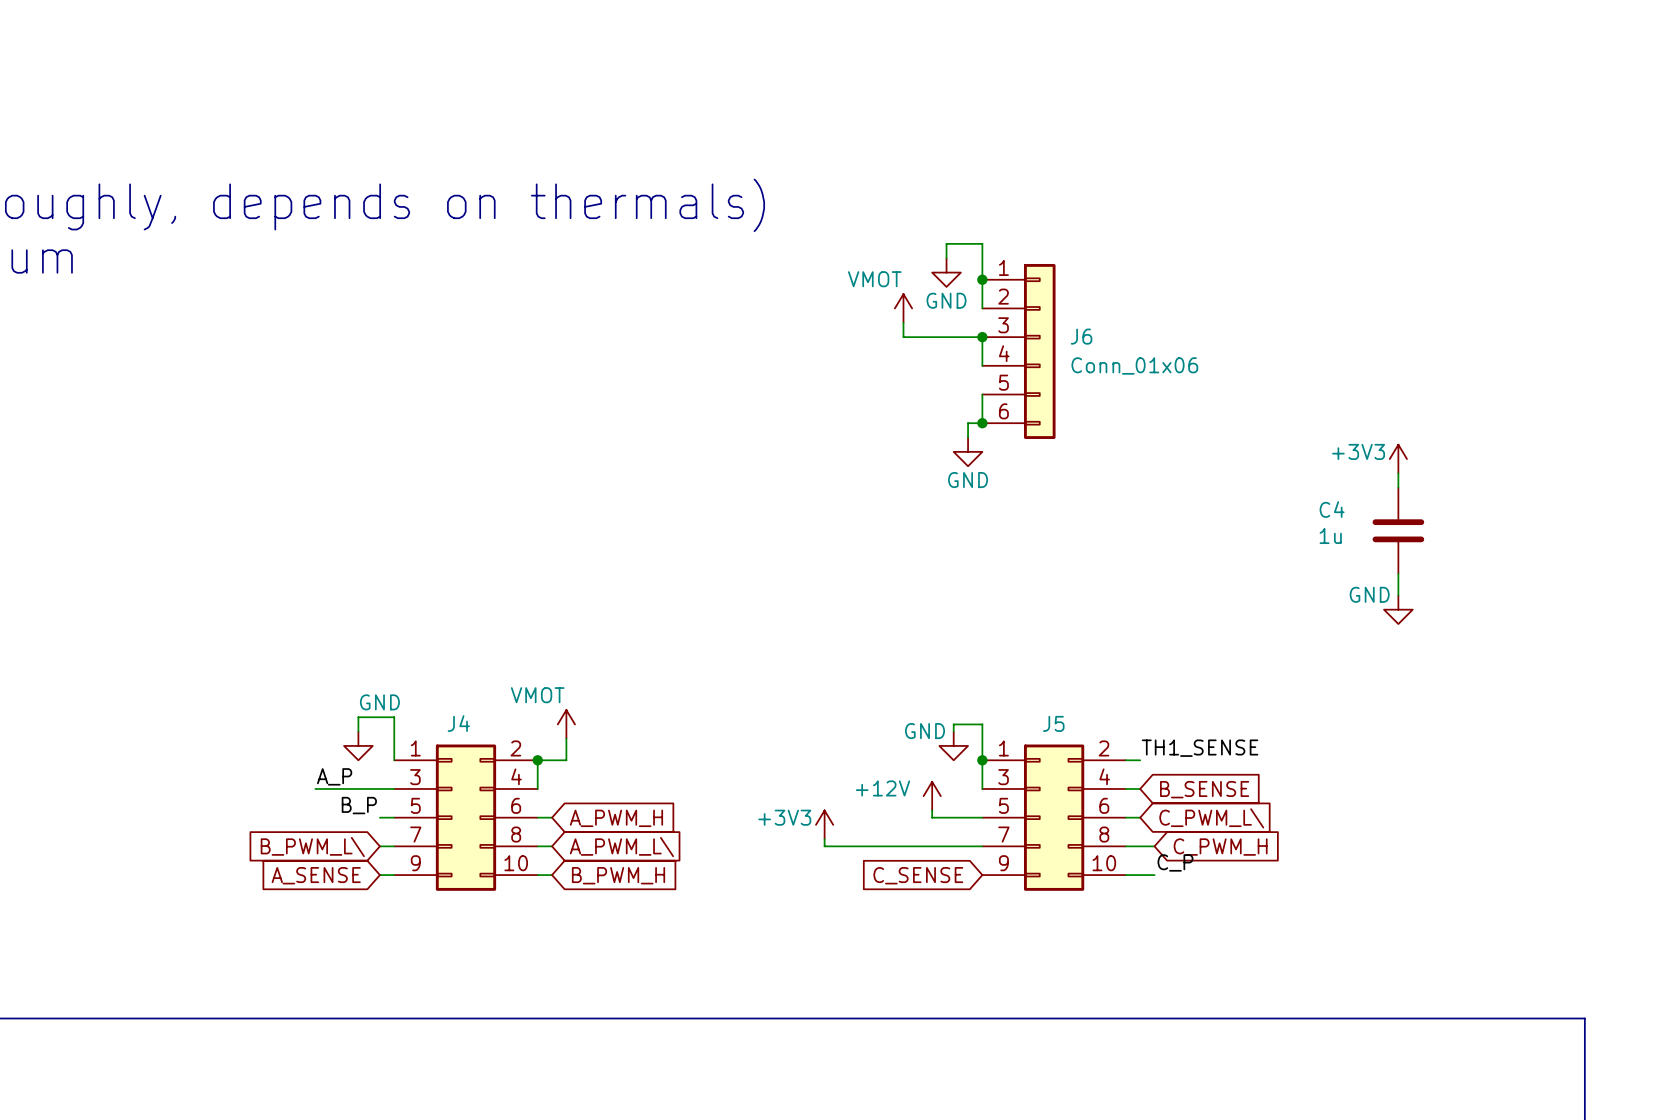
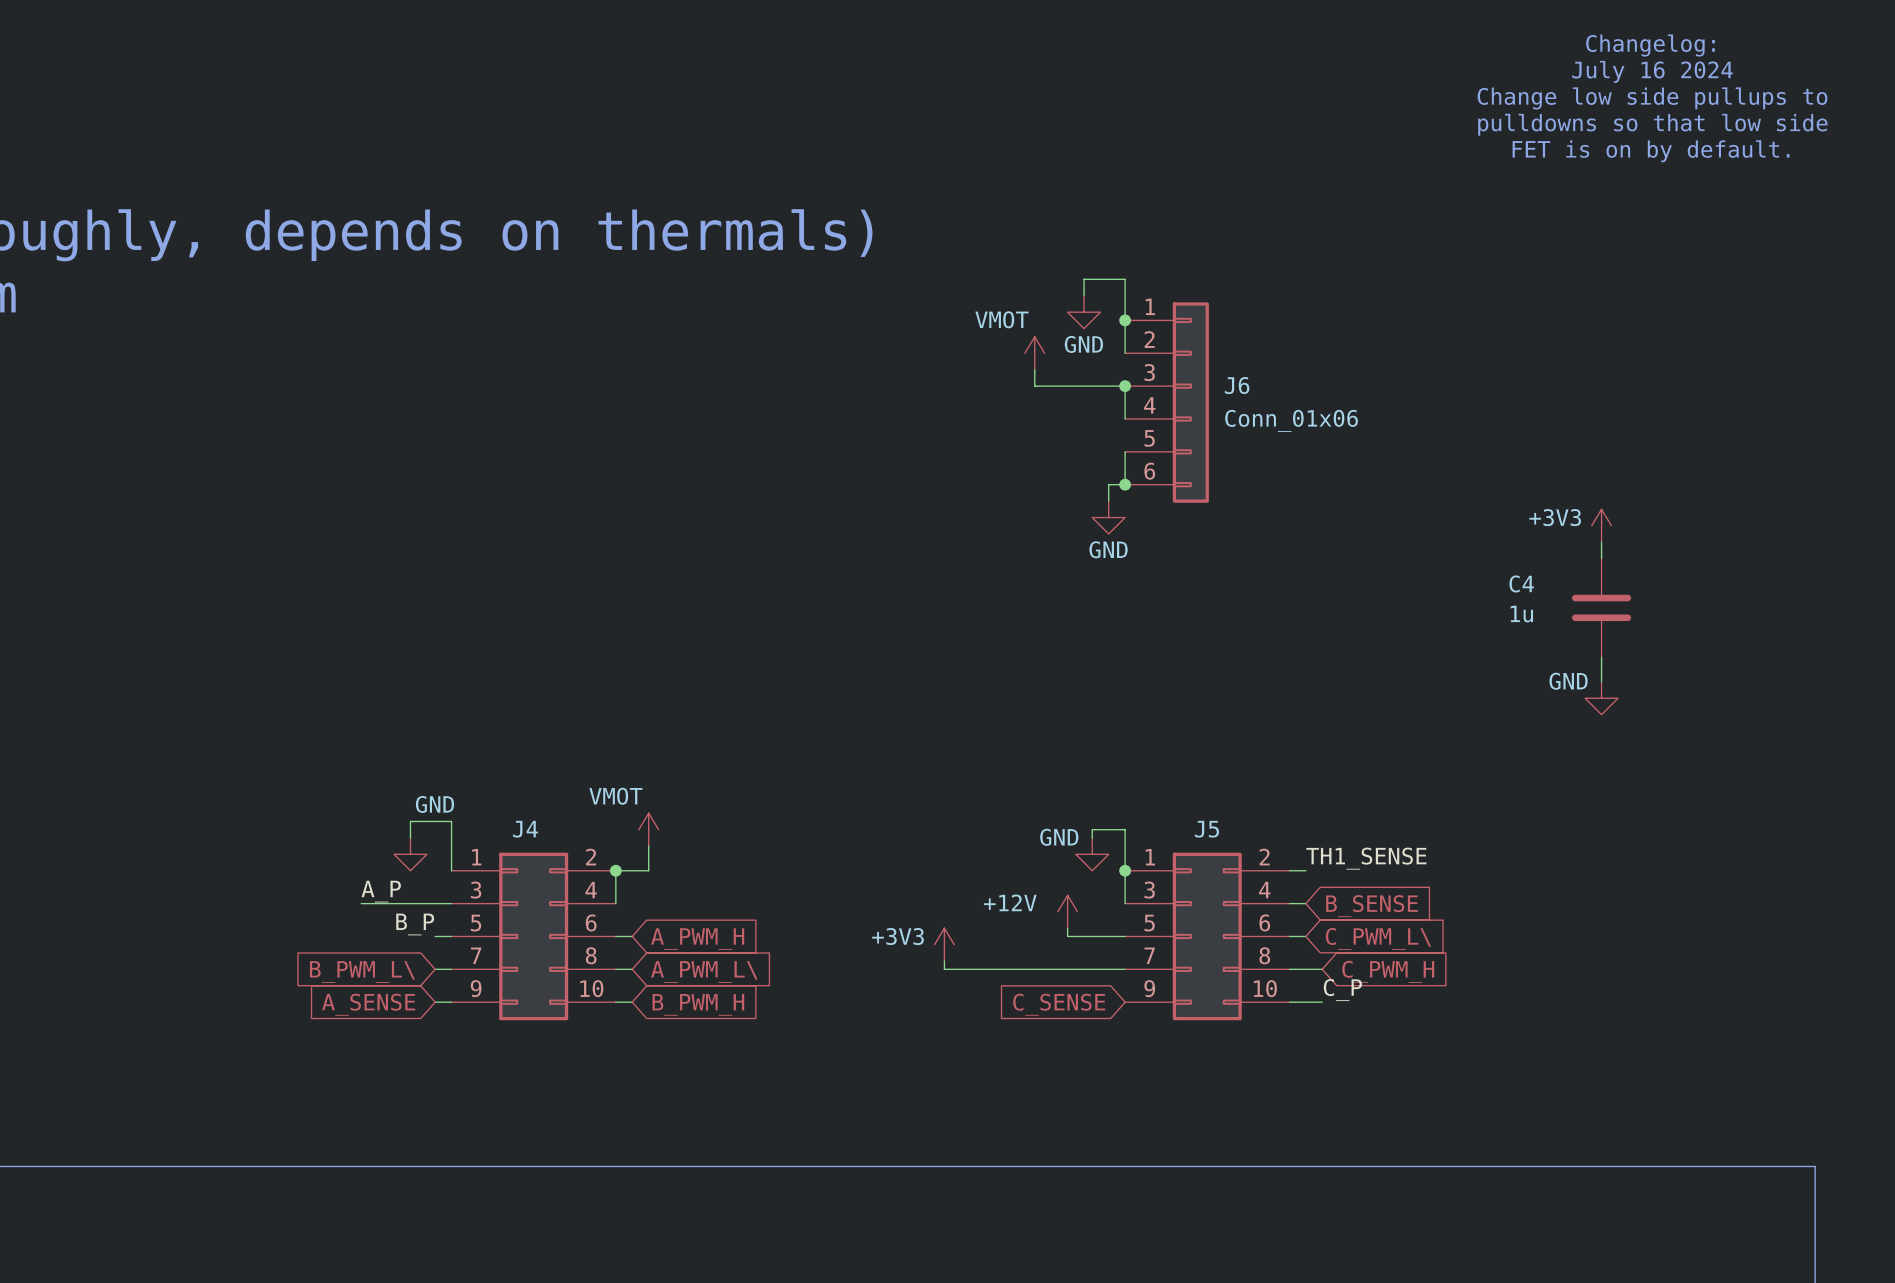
text: none -> Changelog: (1650, 45)
text: none -> July 16 2024 (1652, 71)
text: none -> Change low side pullups to (1652, 98)
text: none -> pulldowns so that low side (1652, 124)
text: none -> FET is on by default. (1651, 151)

